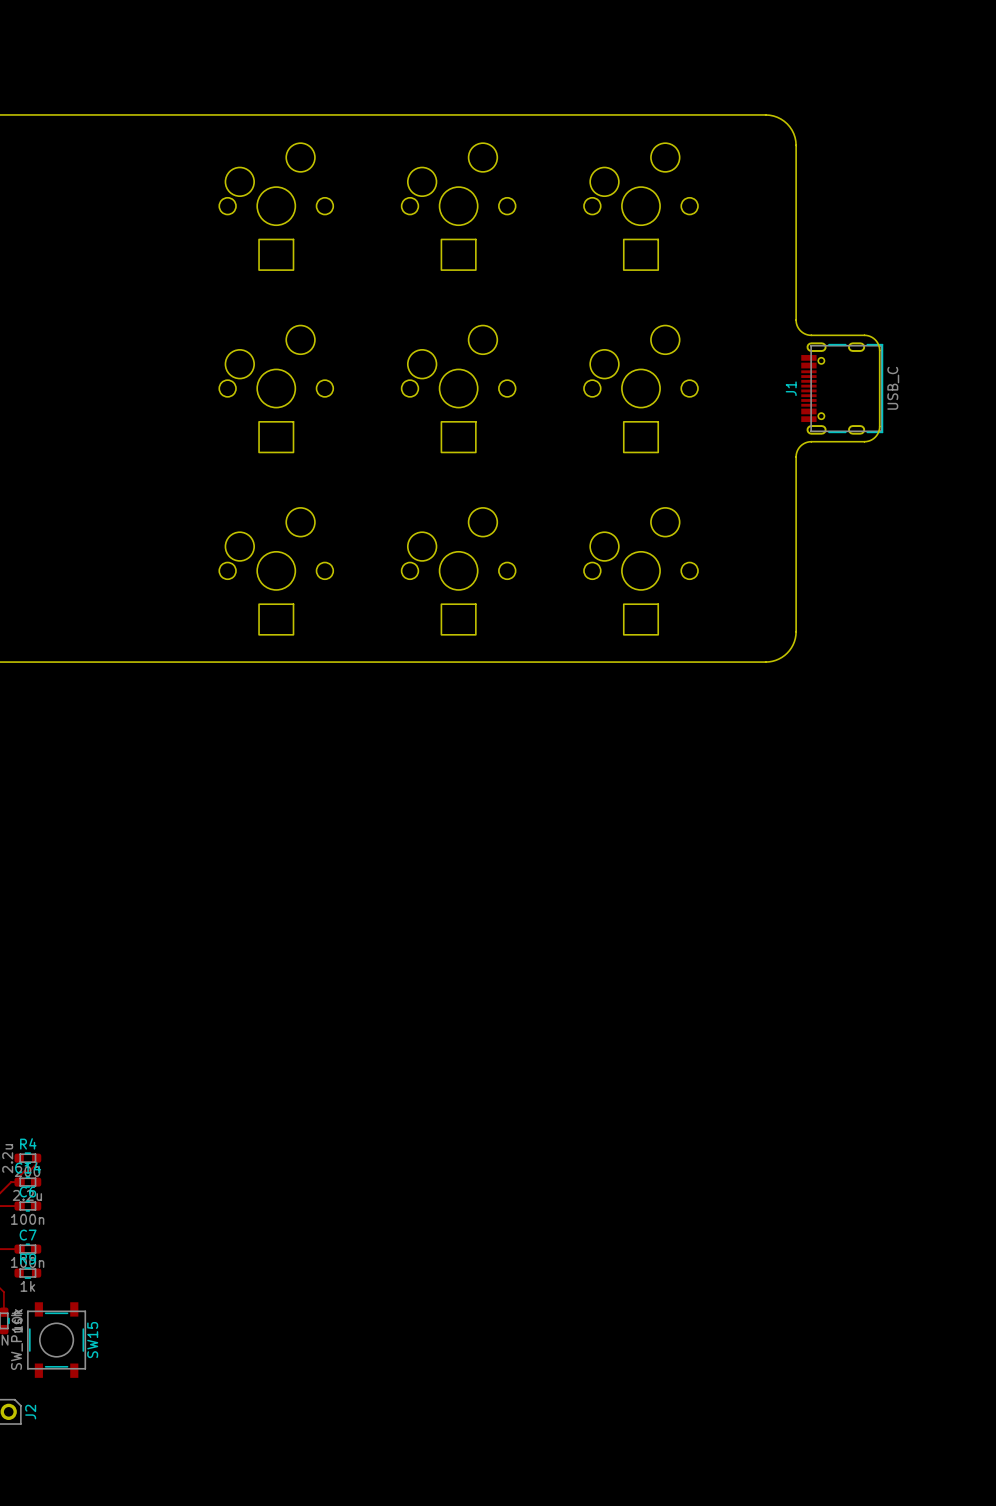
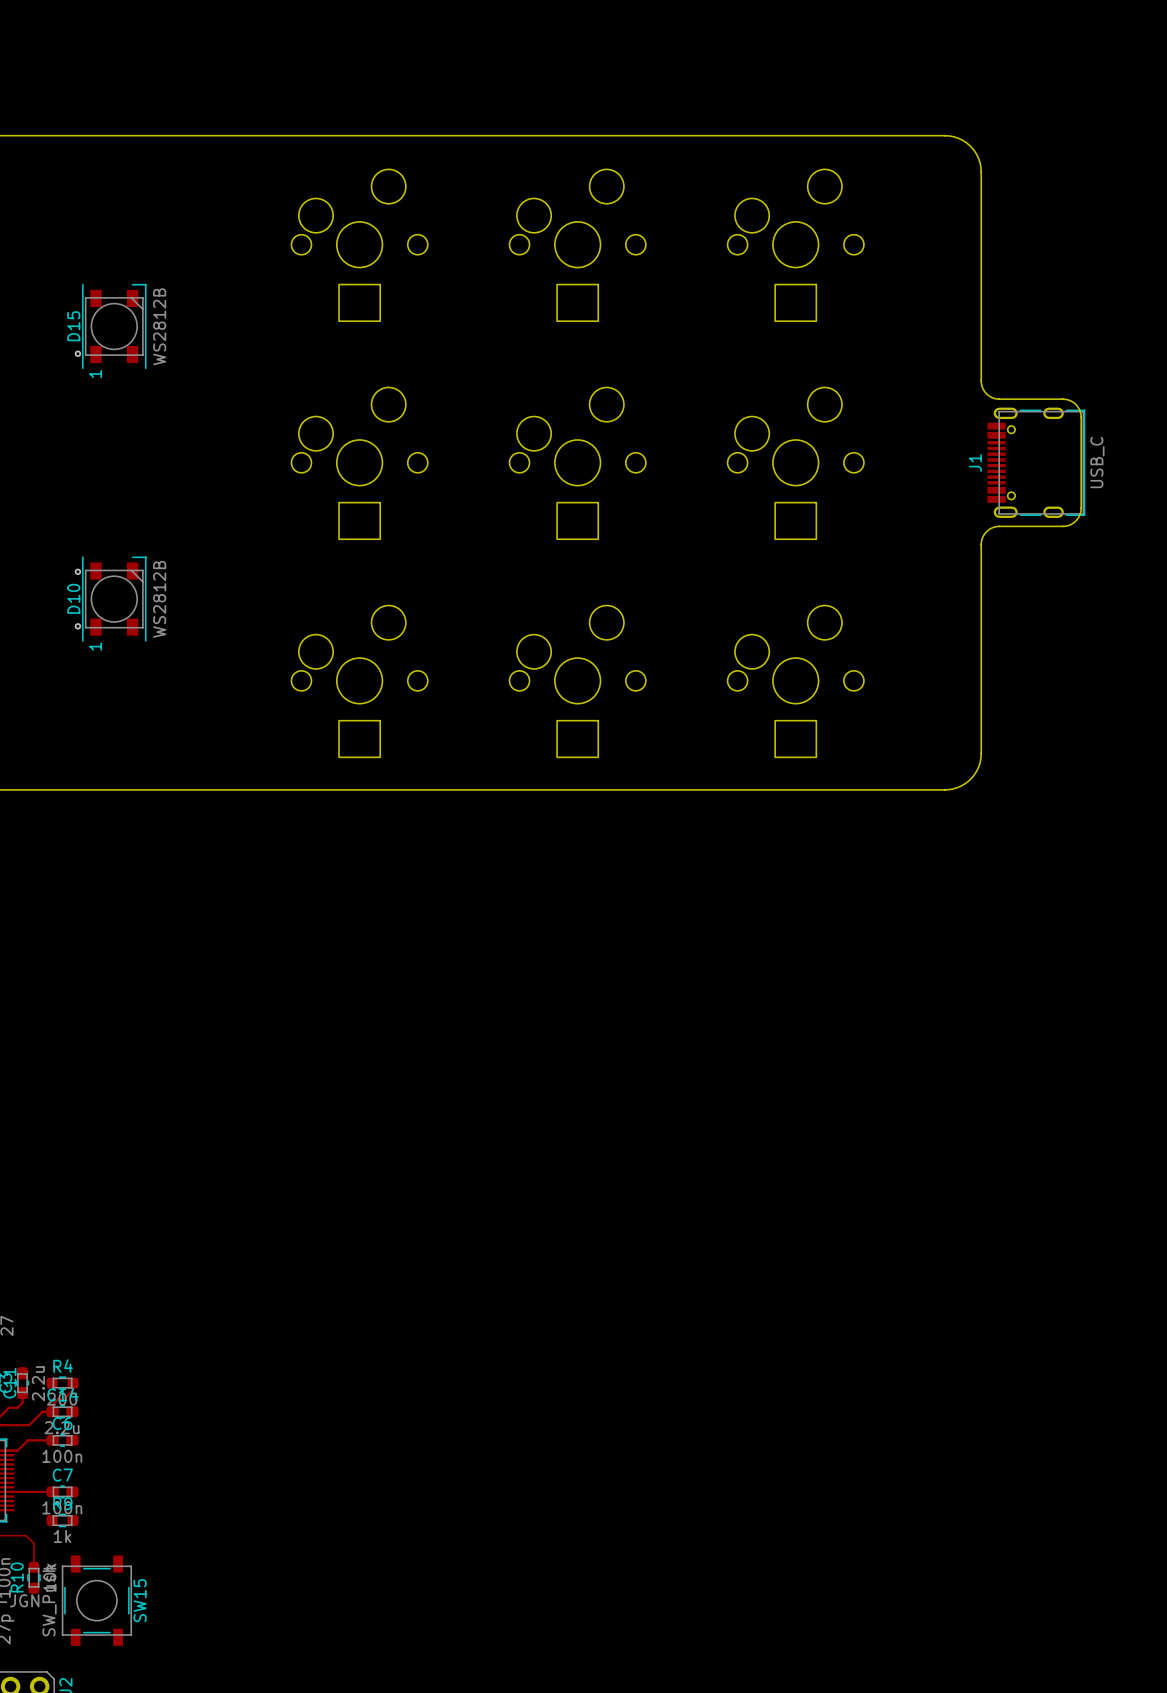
D15: none -> WS2812B (114, 326)
via: none -> (77, 353)
via: none -> (77, 571)
D10: none -> WS2812B (114, 599)
via: none -> (77, 626)

